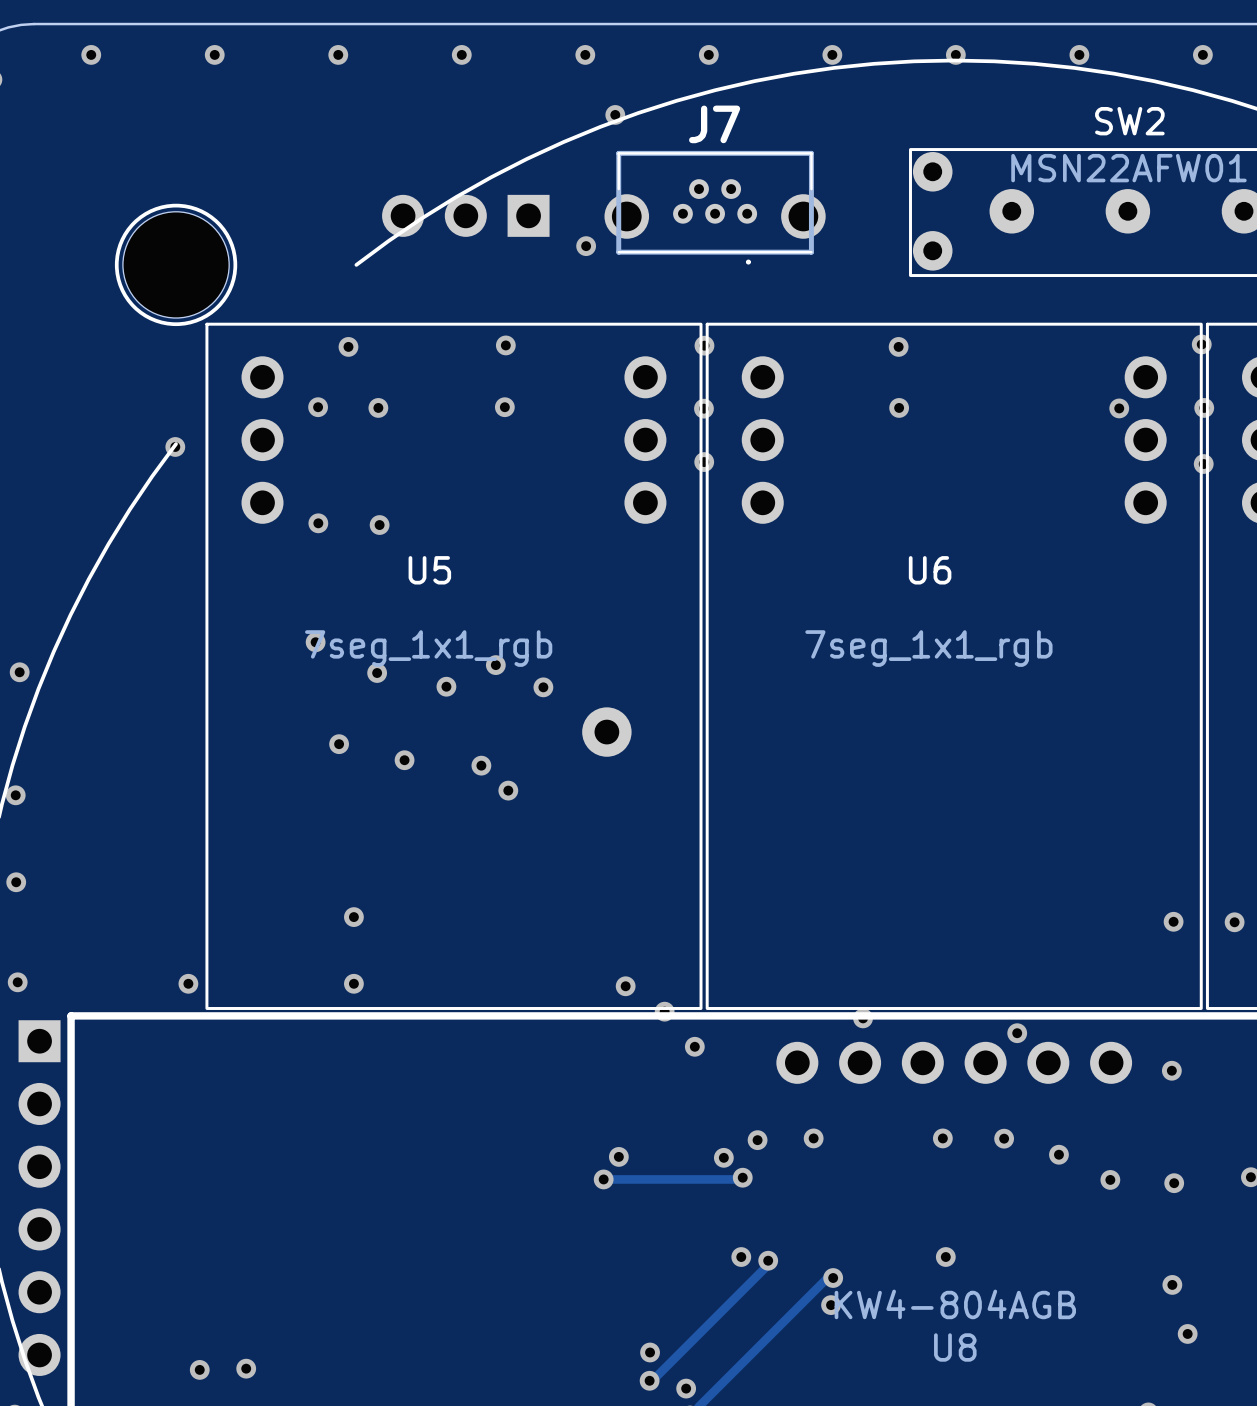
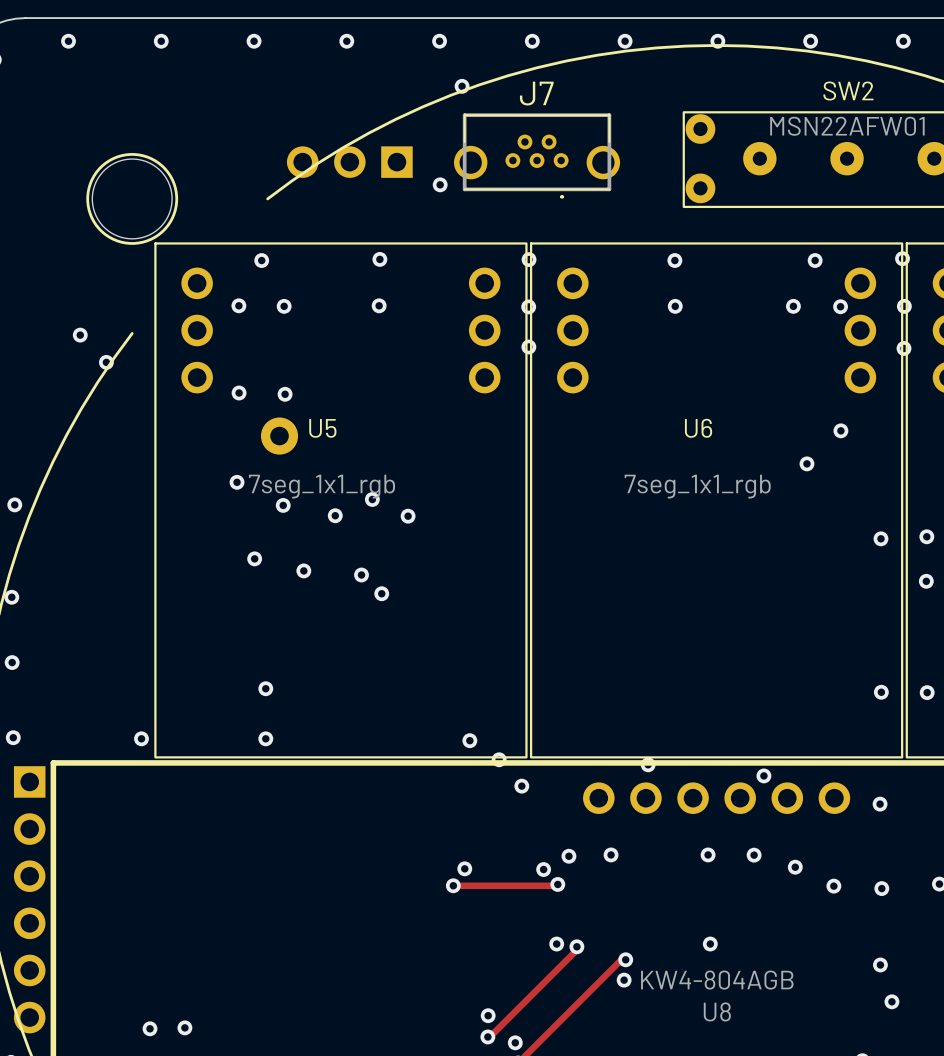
via: none -> (815, 260)
via: none -> (793, 306)
via: none -> (80, 335)
via: (175, 446) -> none
via: none -> (106, 362)
via: none -> (840, 430)
via: none -> (806, 463)
via: none -> (926, 536)
via: none -> (880, 538)
part position: (606, 732) -> (279, 436)
via: none -> (926, 581)

